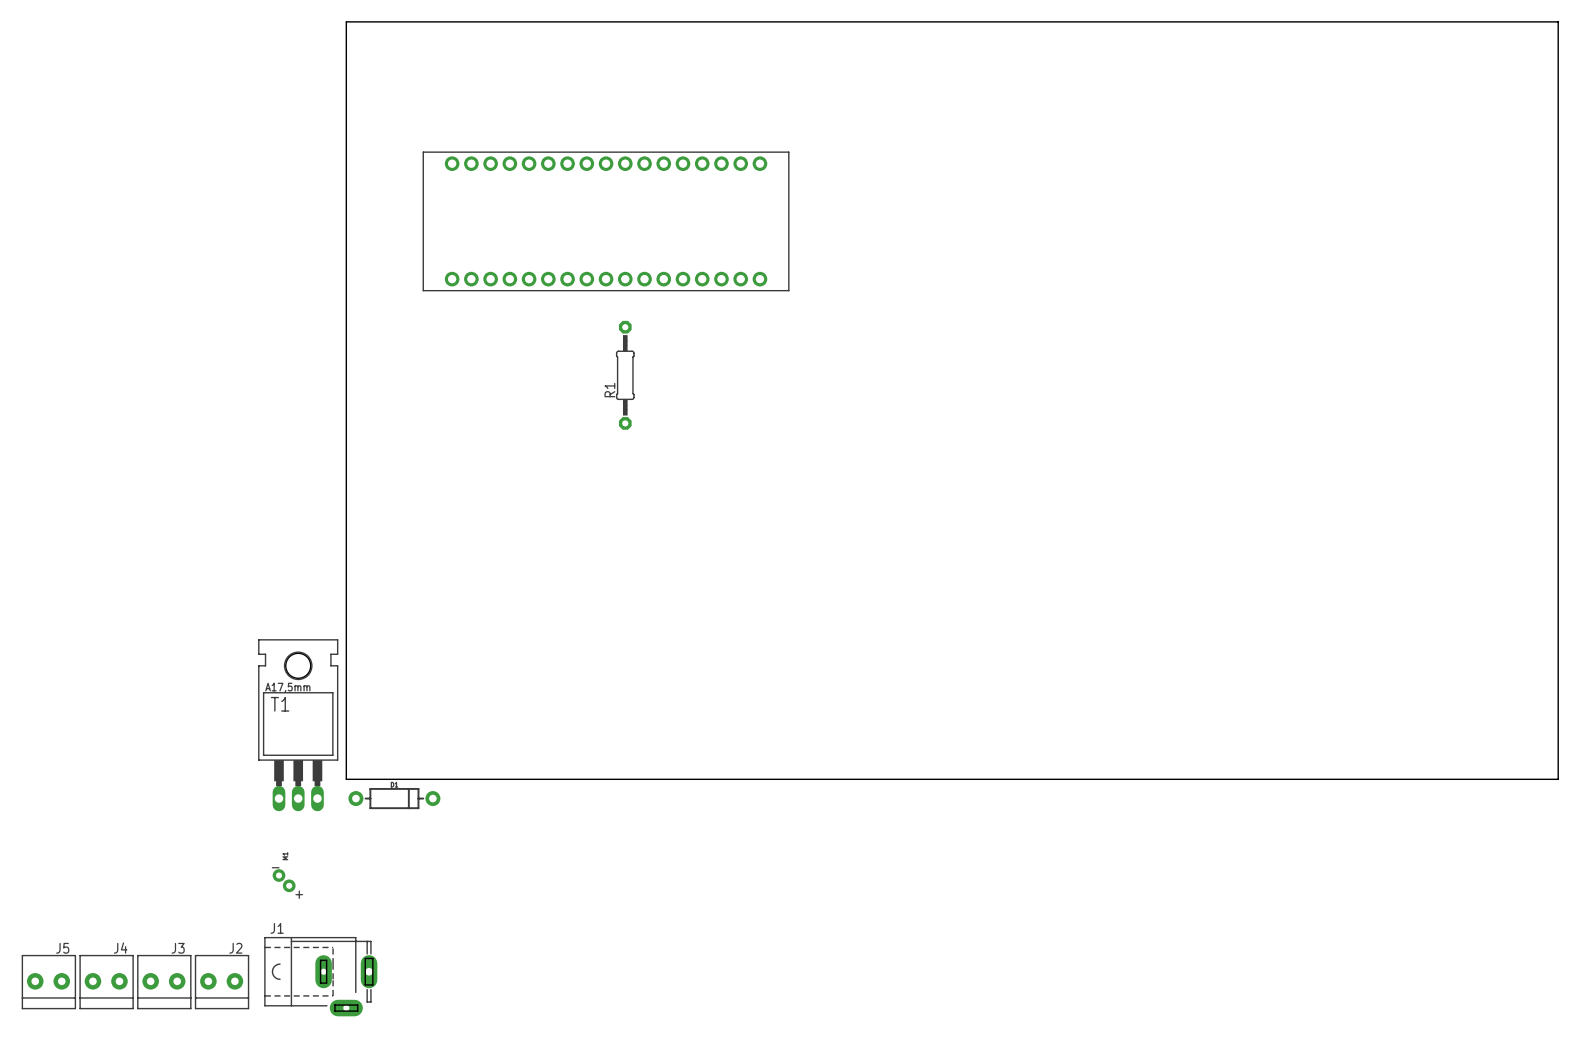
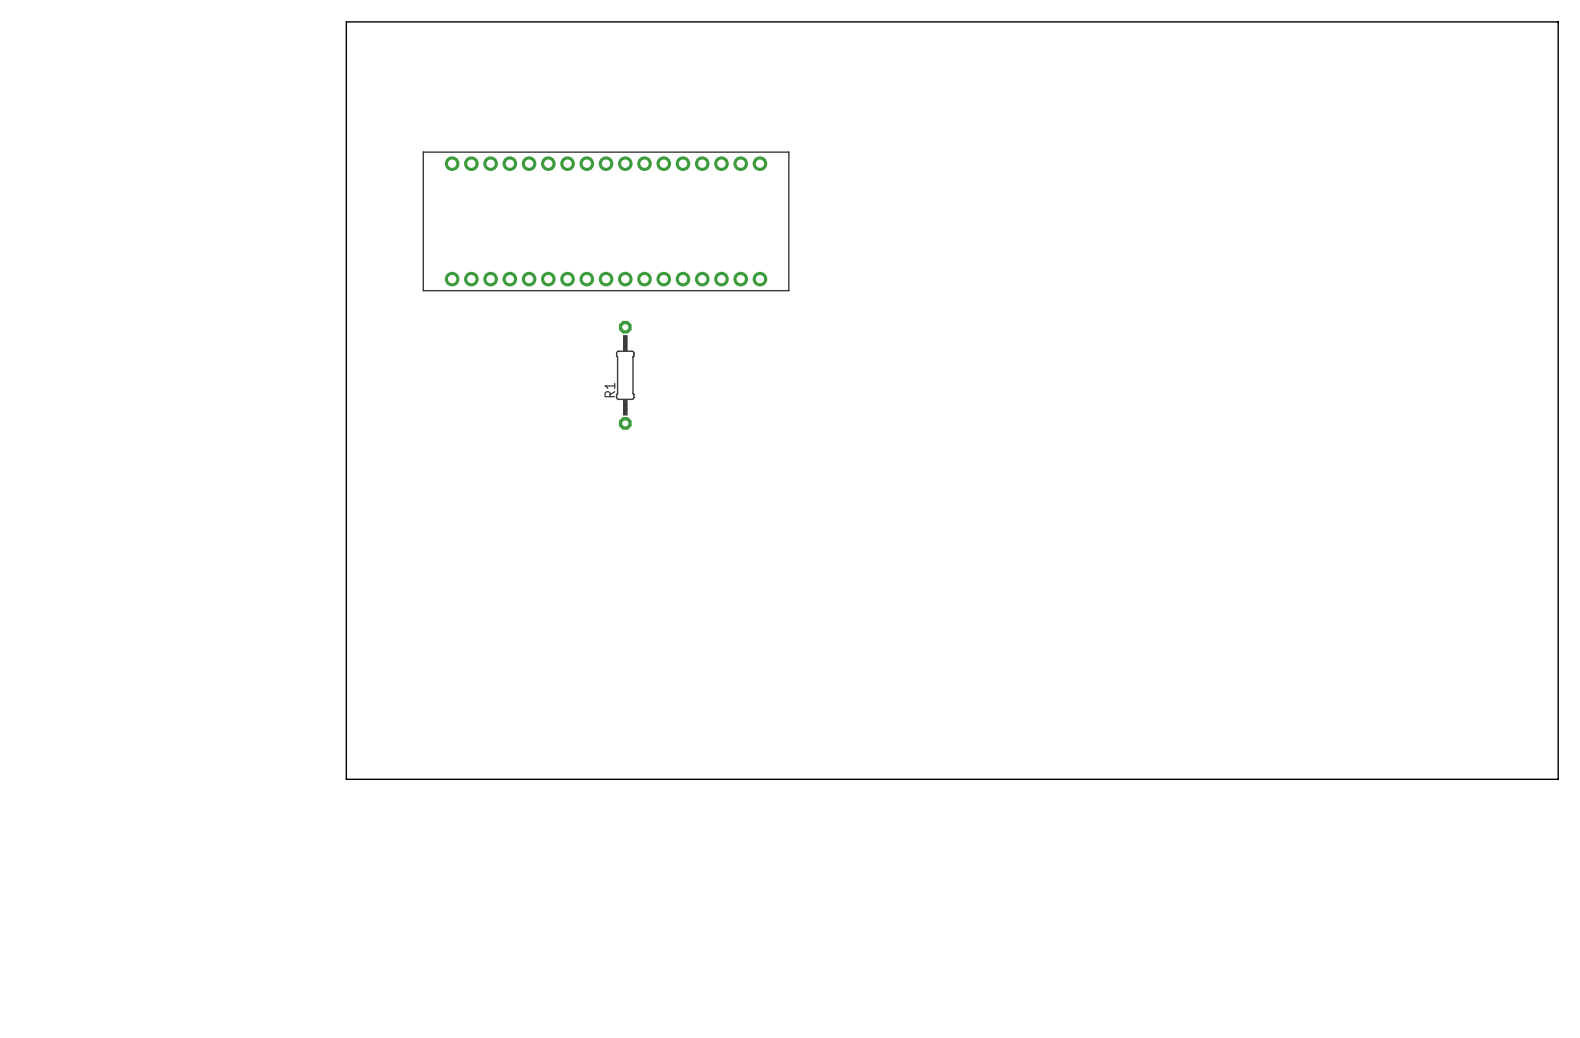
T1: (298, 725) -> none
part: (394, 798) -> none
part: (284, 880) -> none
J1: (320, 976) -> none
J5: (48, 982) -> none
J4: (106, 982) -> none
J3: (164, 982) -> none
J2: (222, 982) -> none

